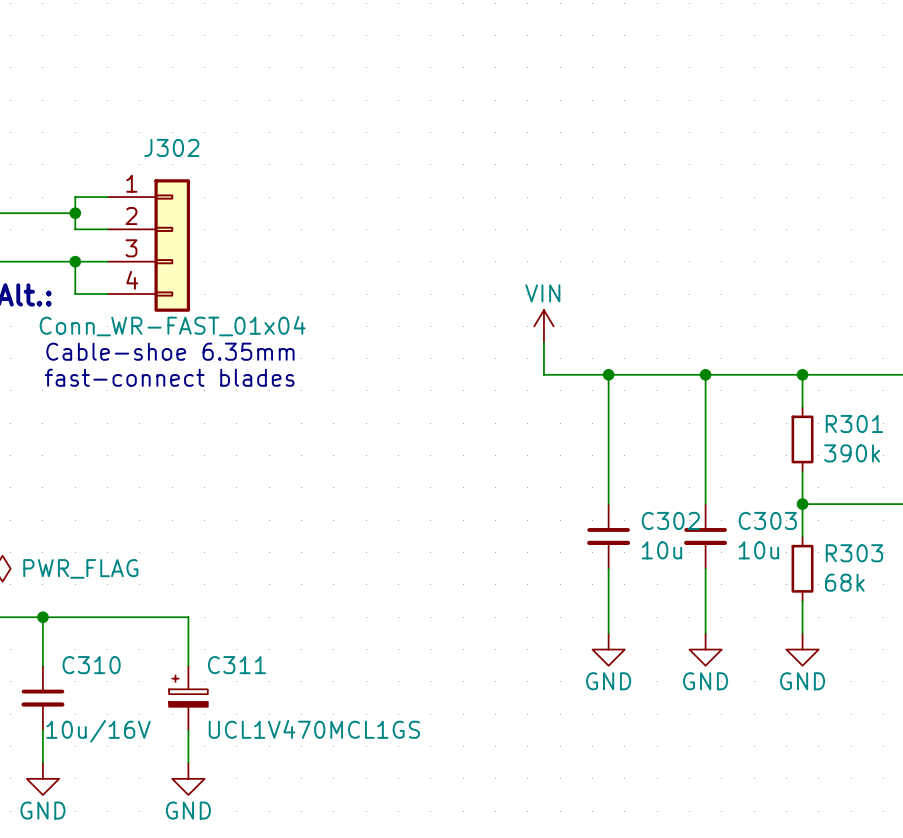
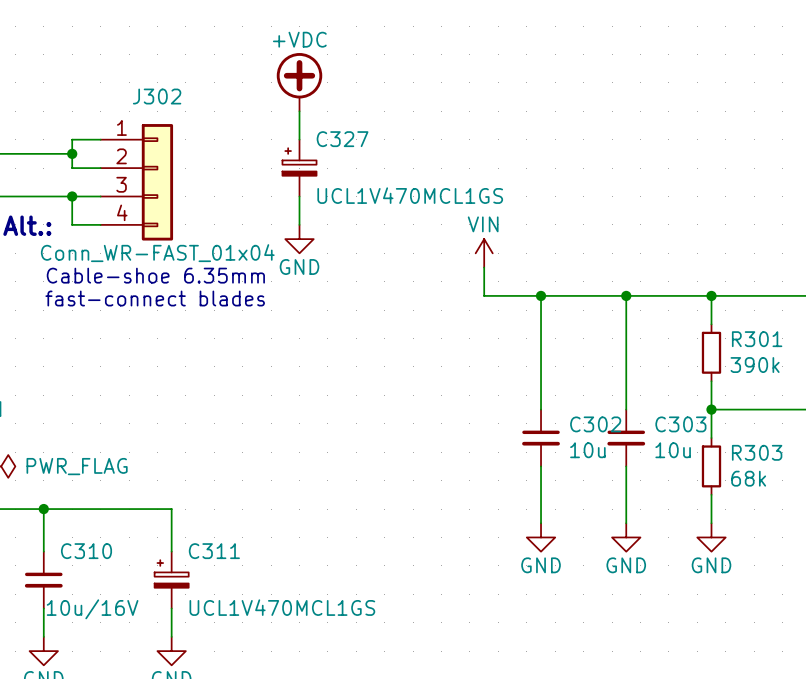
power symbol: none -> +VDC (299, 82)
wire: none -> (299, 111) (299, 139)
C327: none -> UCL1V470MCL1GS (299, 168)
wire: none -> (299, 196) (299, 224)
power symbol: none -> GND (299, 239)

